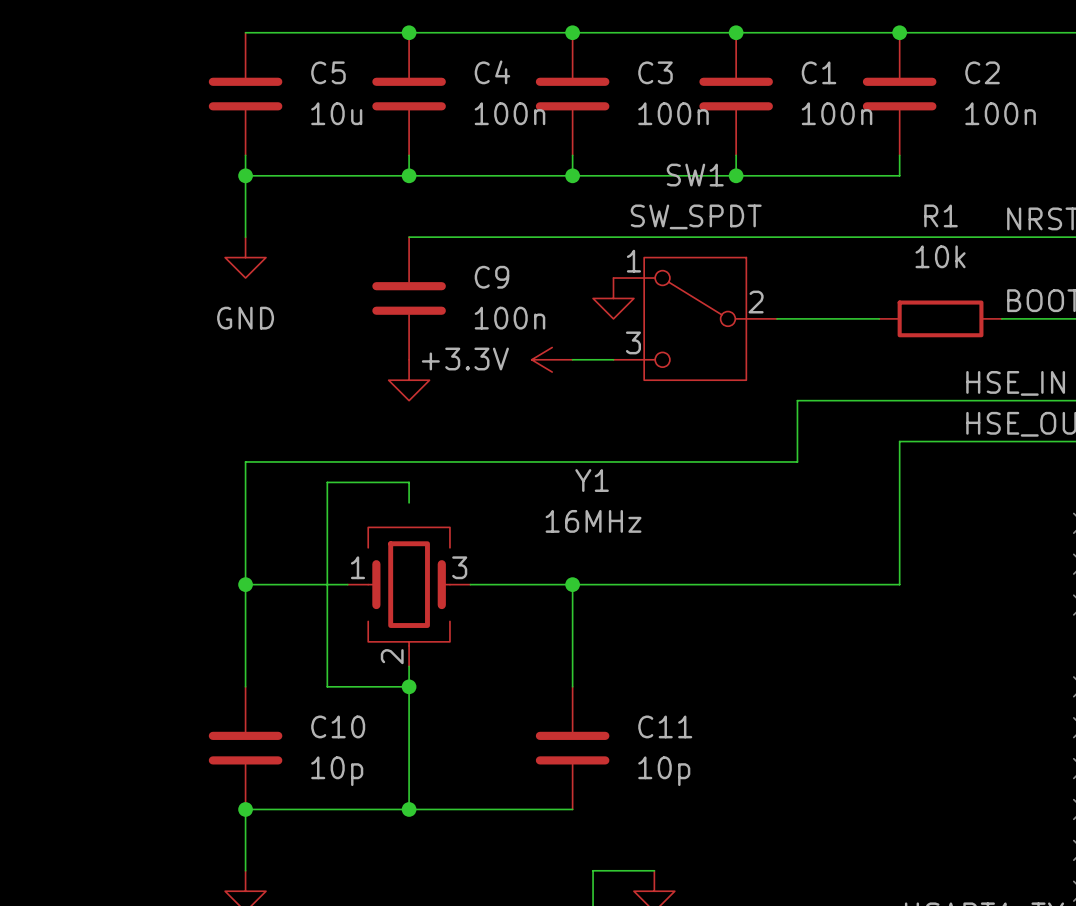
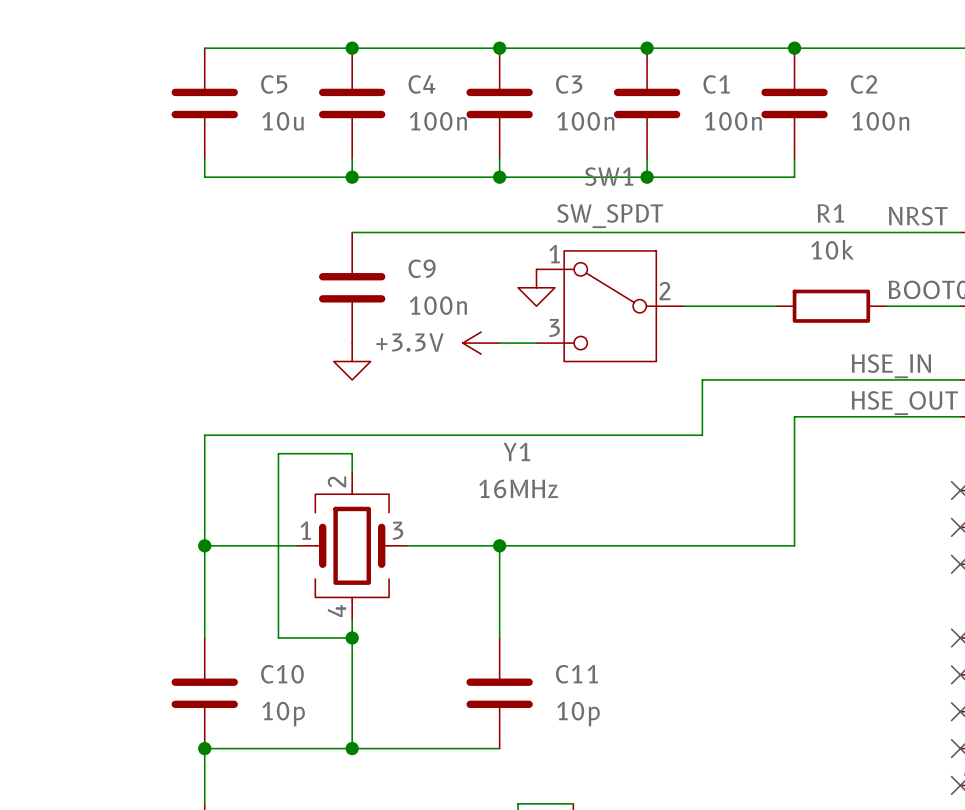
wire: (245, 175) (245, 237) -> none
junction: (245, 175) -> none
power symbol: GND (245, 257) -> none
Y1 symbol: [347, 527, 471, 667] -> [296, 472, 408, 620]

